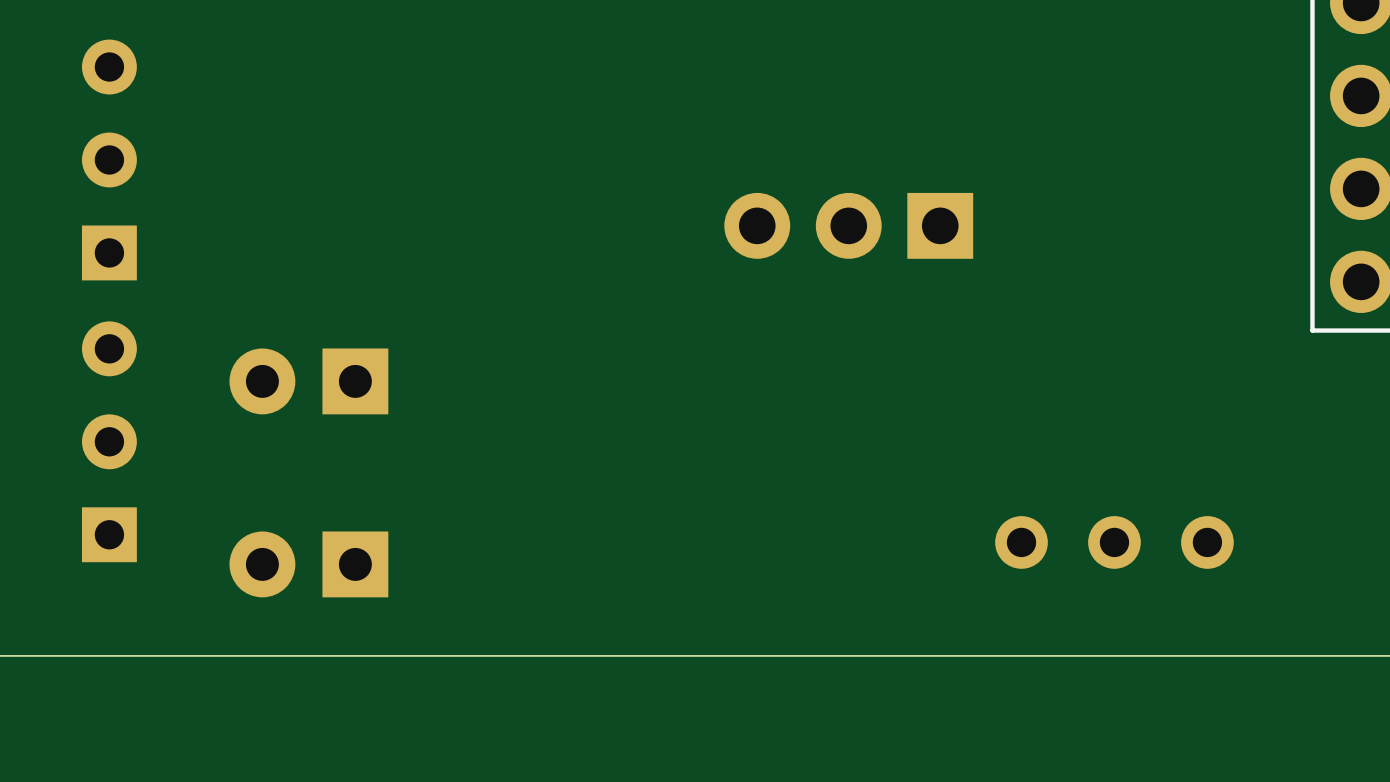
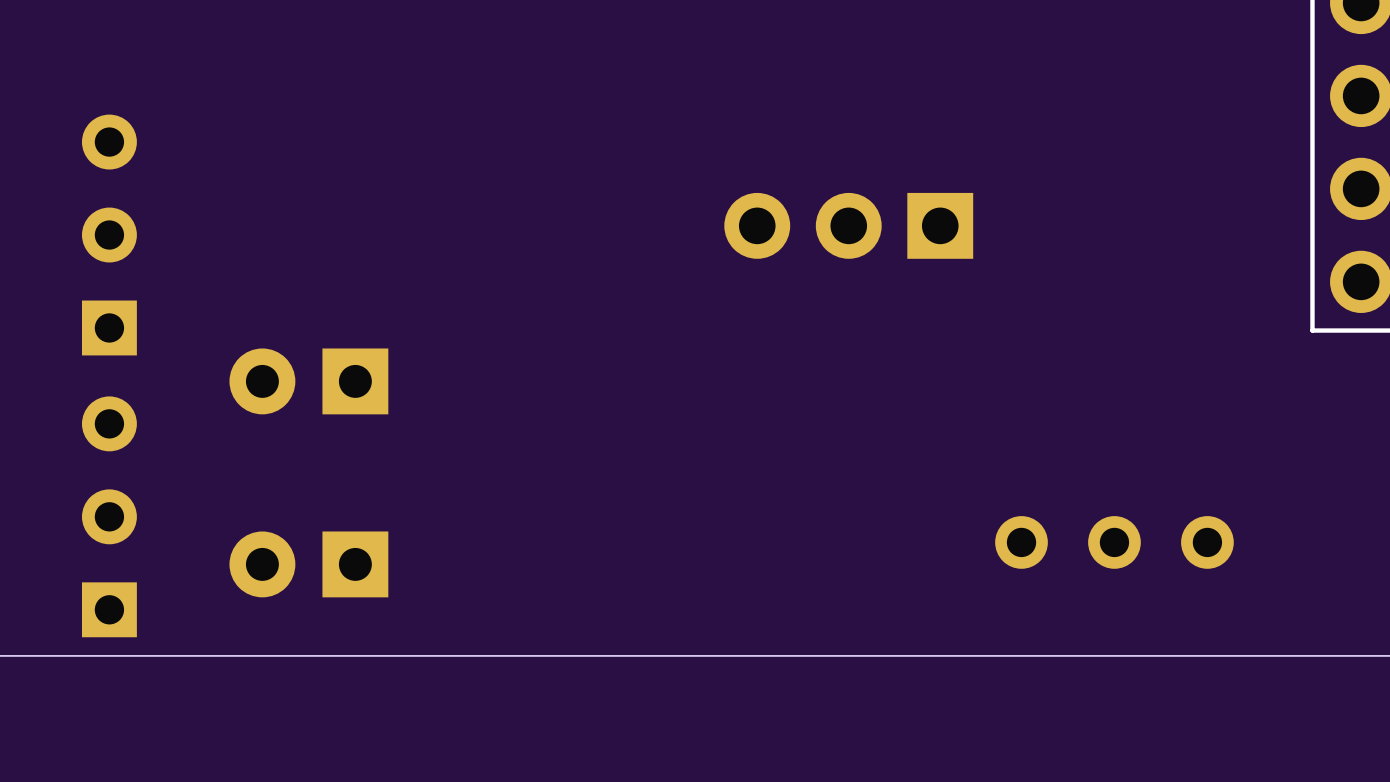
part position: (109, 159) -> (109, 235)
part position: (109, 441) -> (109, 516)

